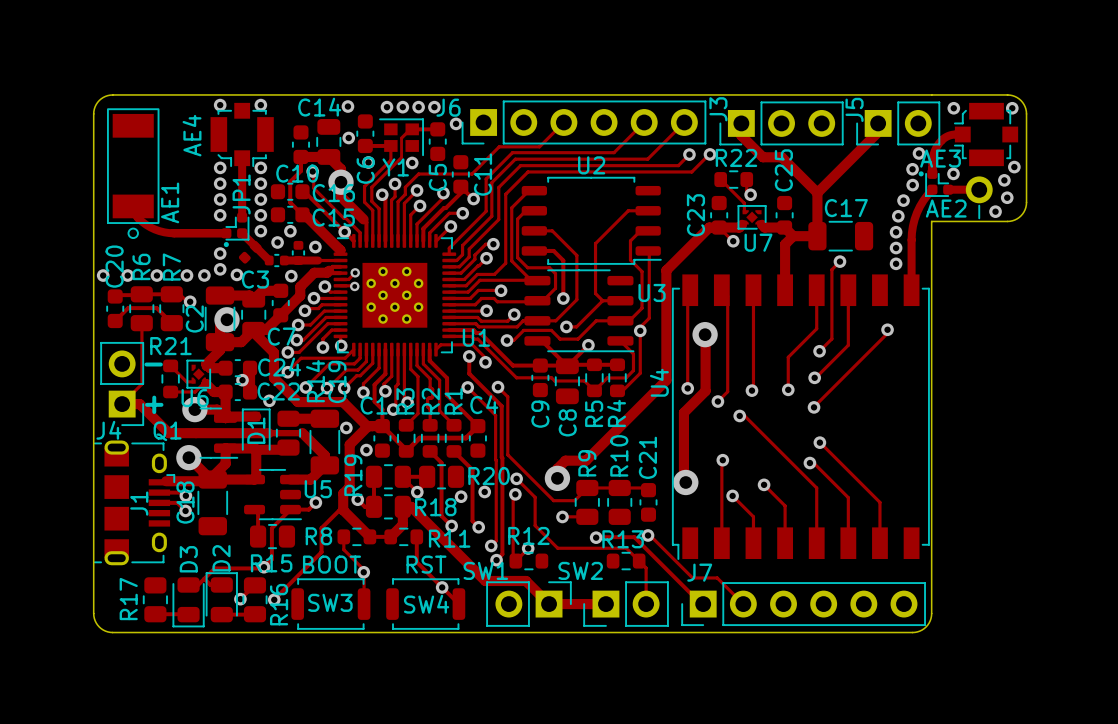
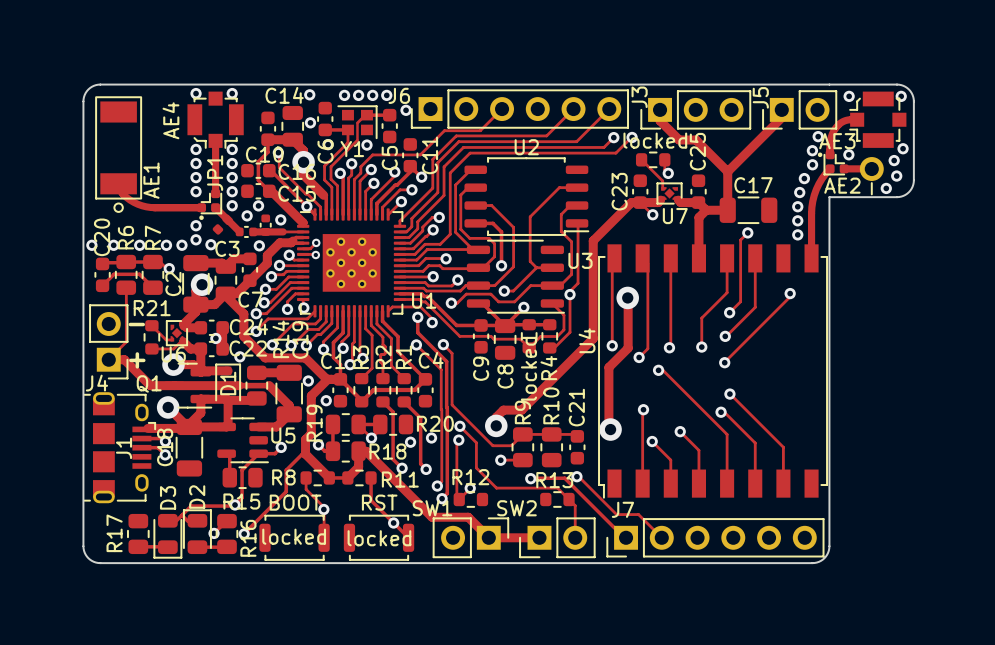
R22 name: R22 (736, 157) -> locked (655, 140)
R5 name: R5 (594, 413) -> locked (528, 368)
SW3 name: SW3 (330, 602) -> locked (294, 536)
SW4 name: SW4 (426, 604) -> locked (379, 538)

